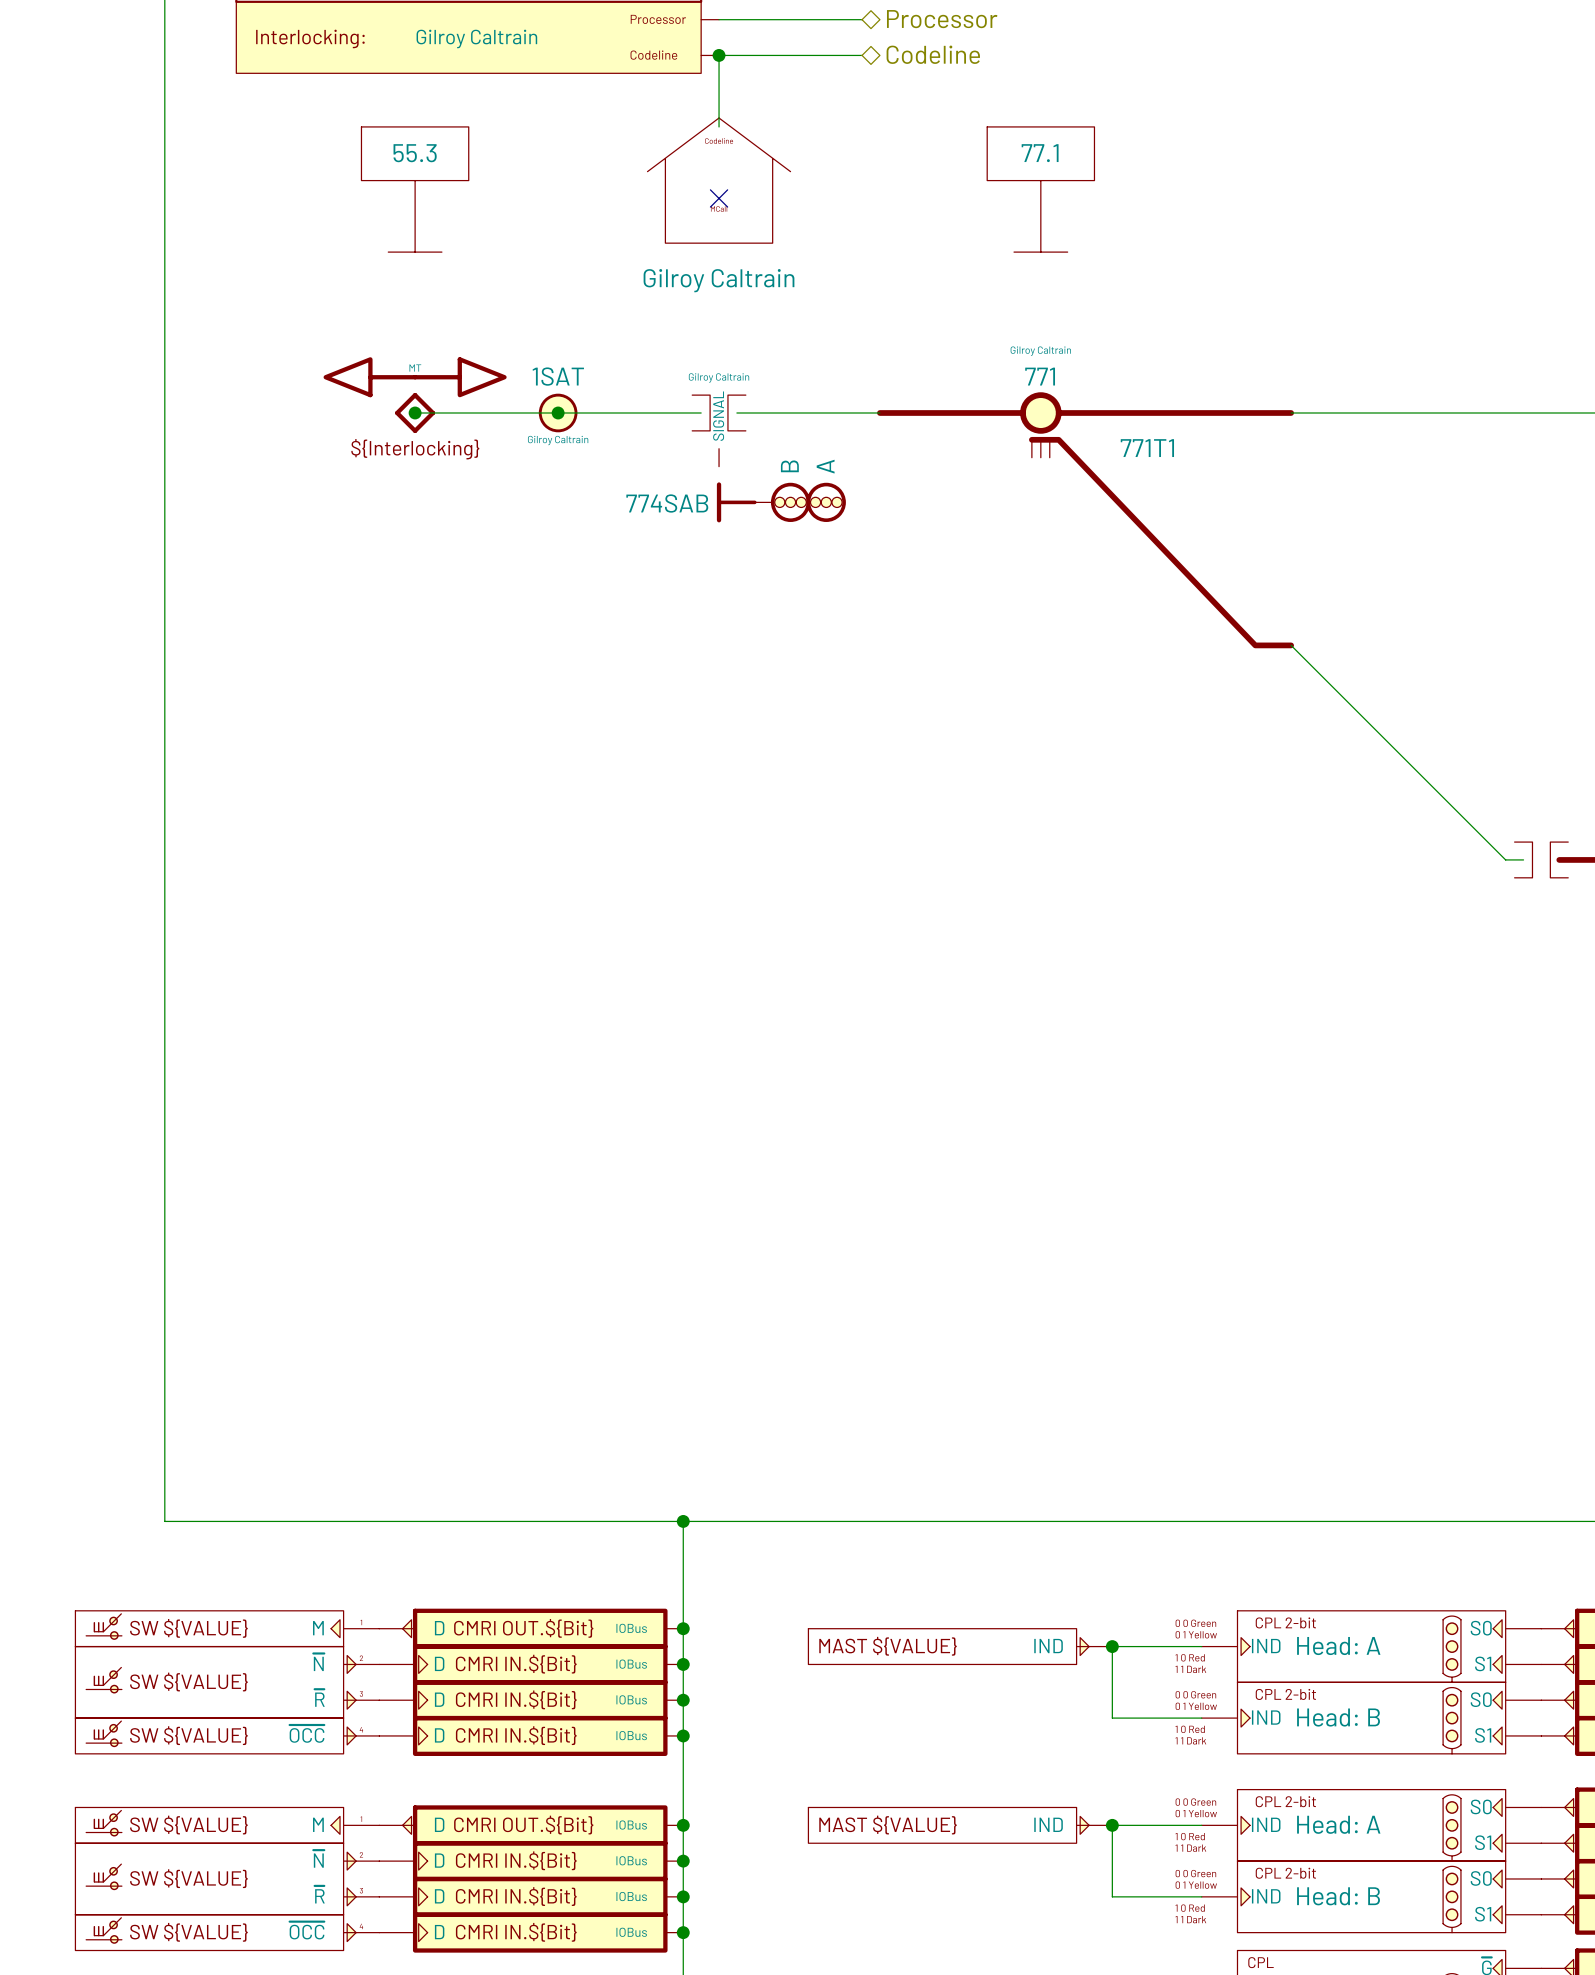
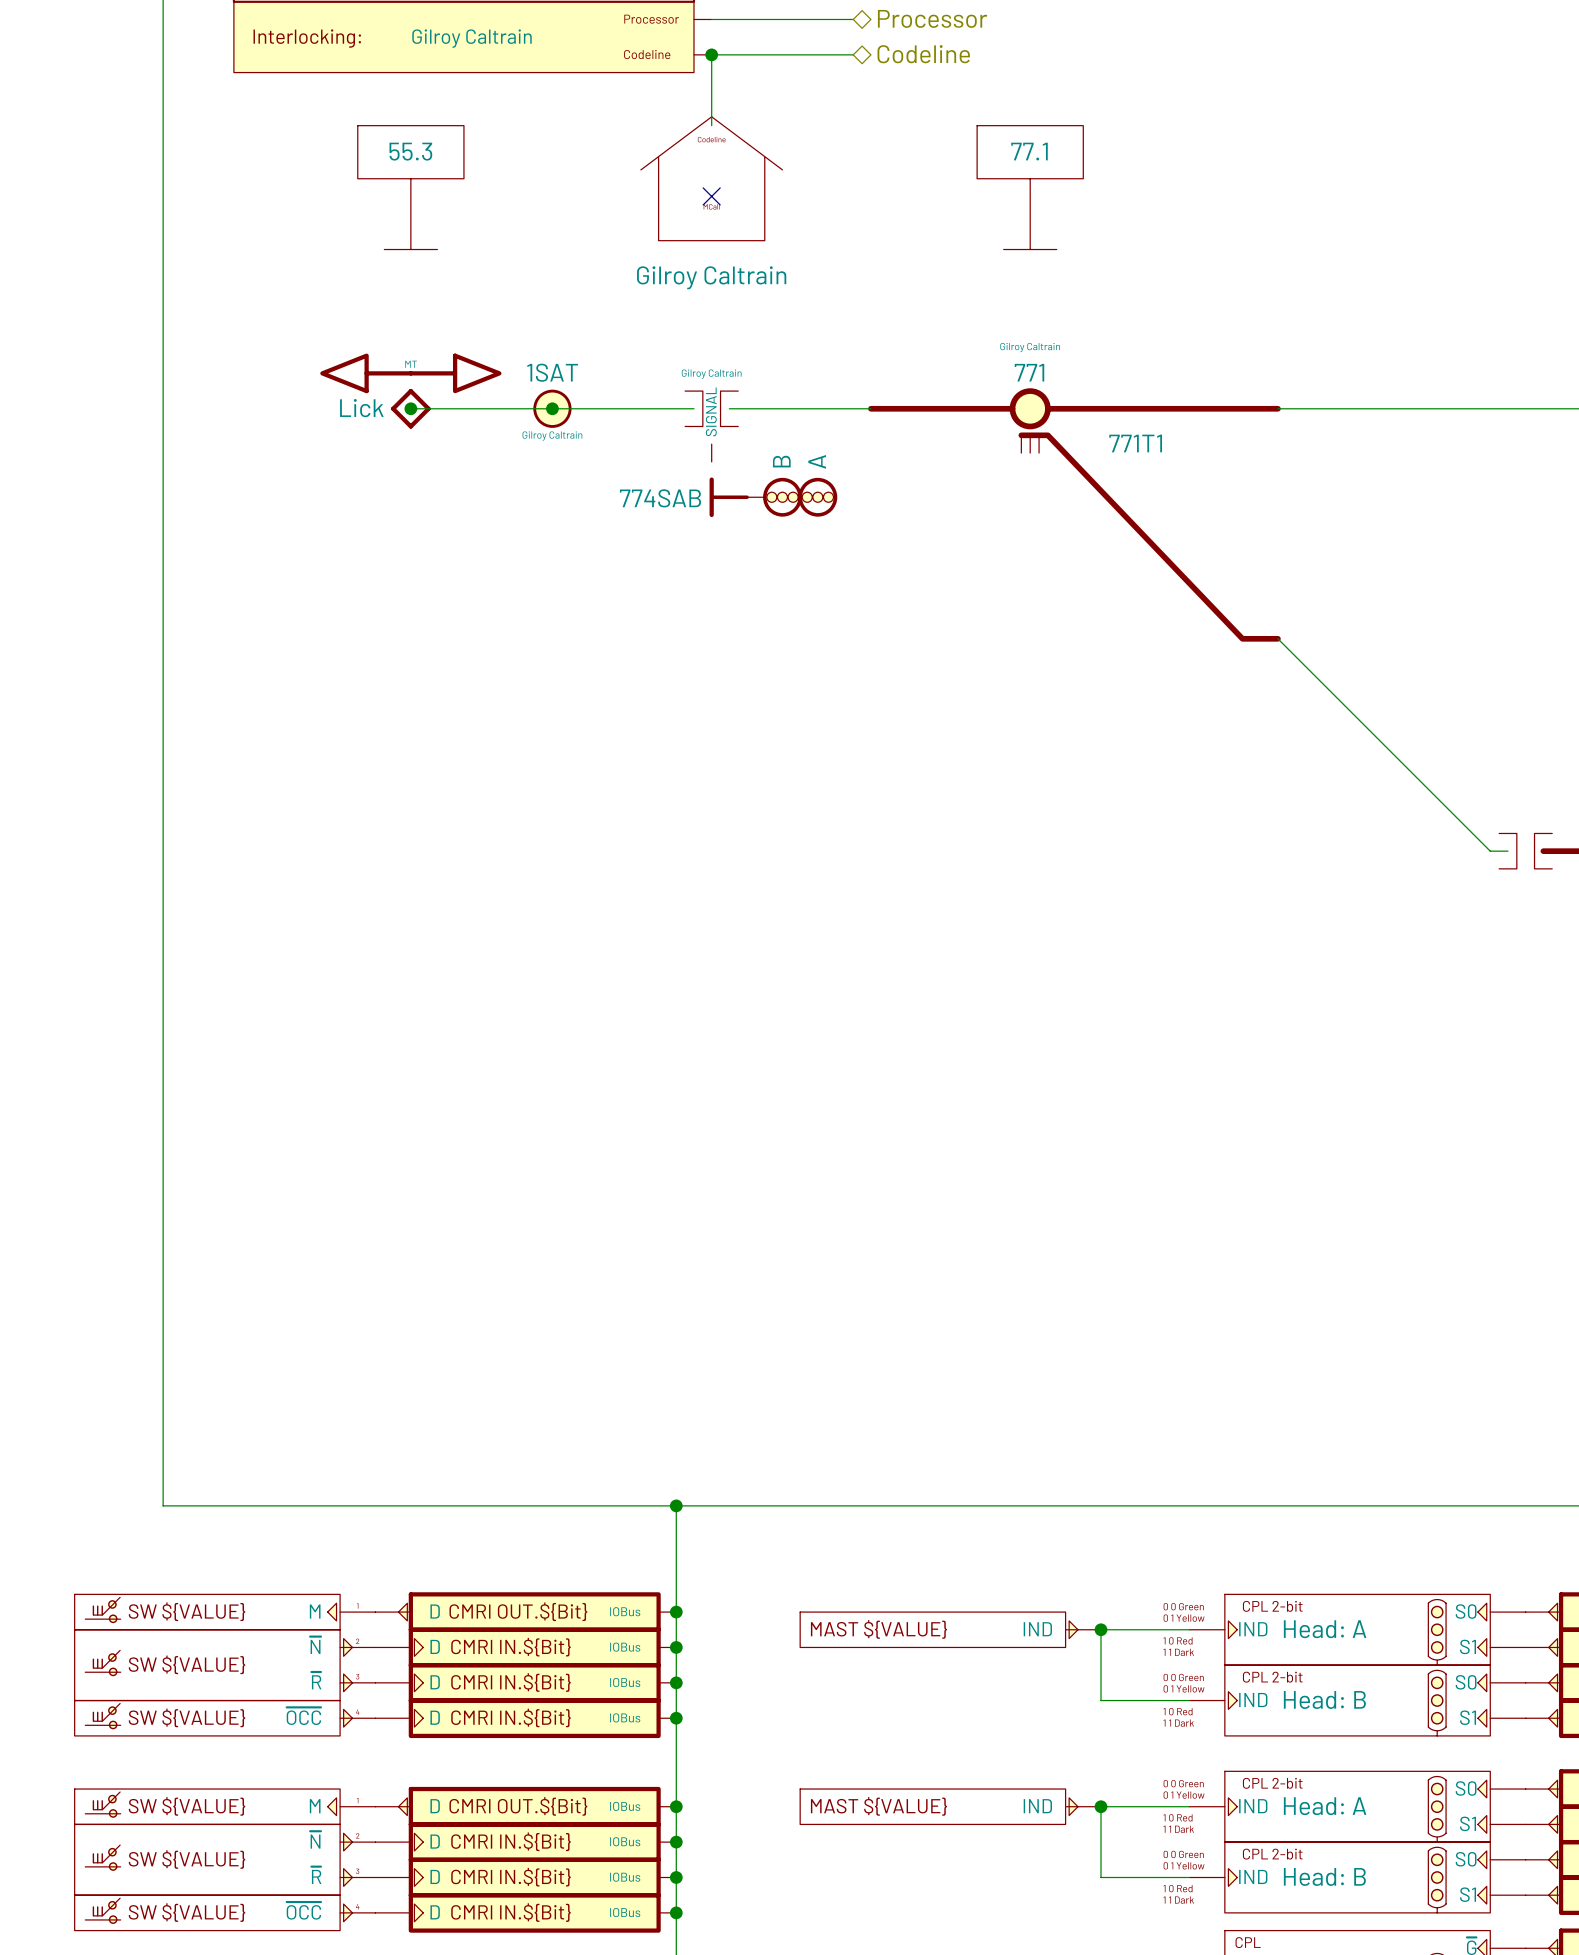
part value: none -> Lick (361, 408)
part text: ${Interlocking} (415, 449) -> none

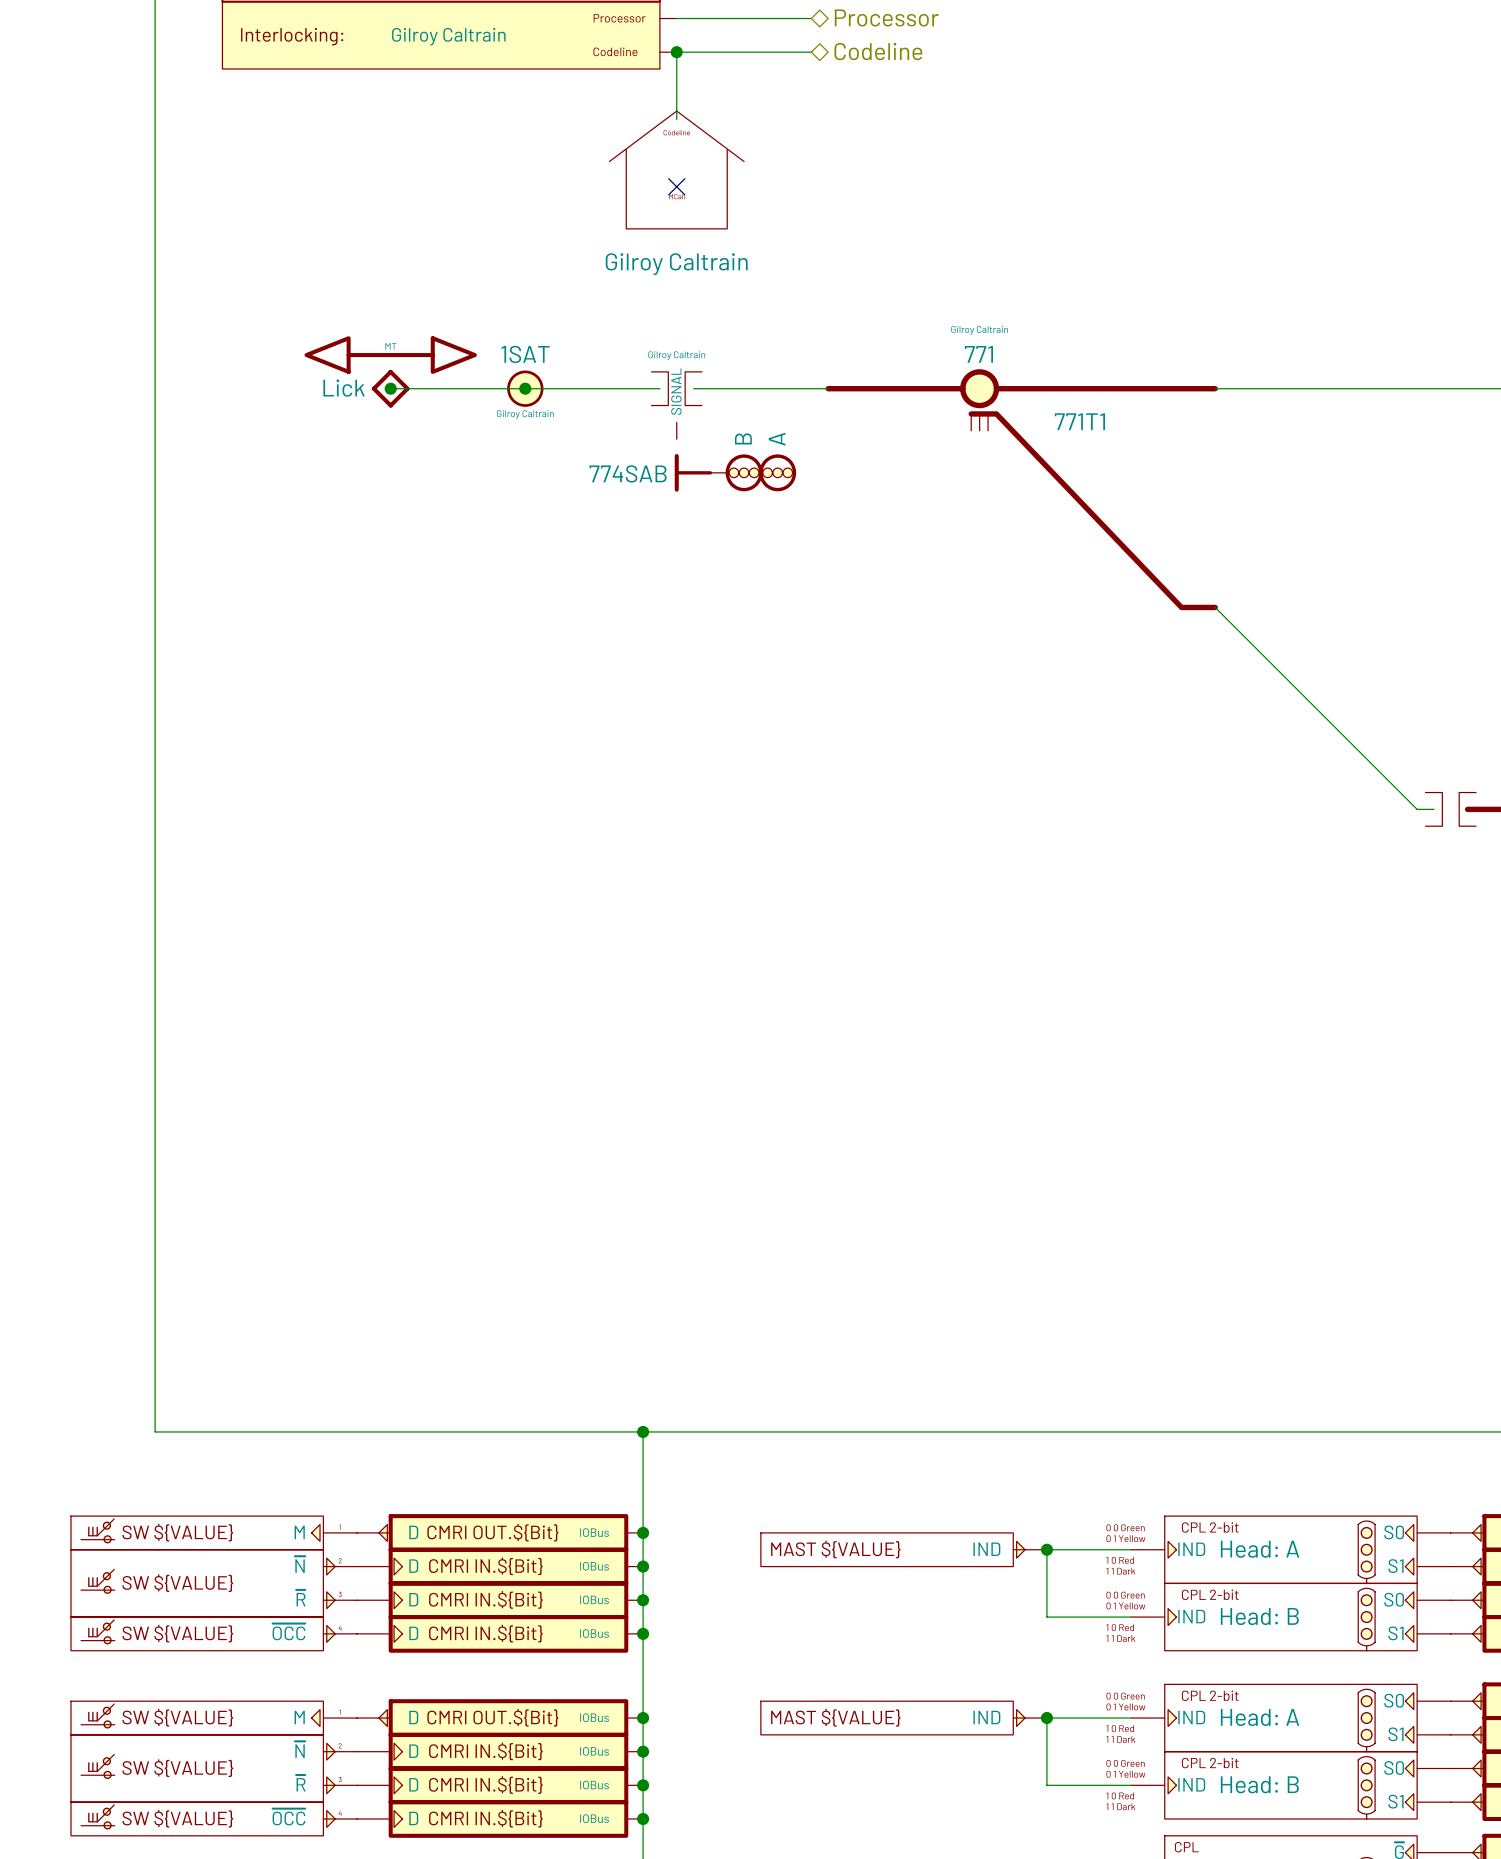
part: 55.3 (410, 187) -> none
part: 77.1 (1030, 187) -> none

